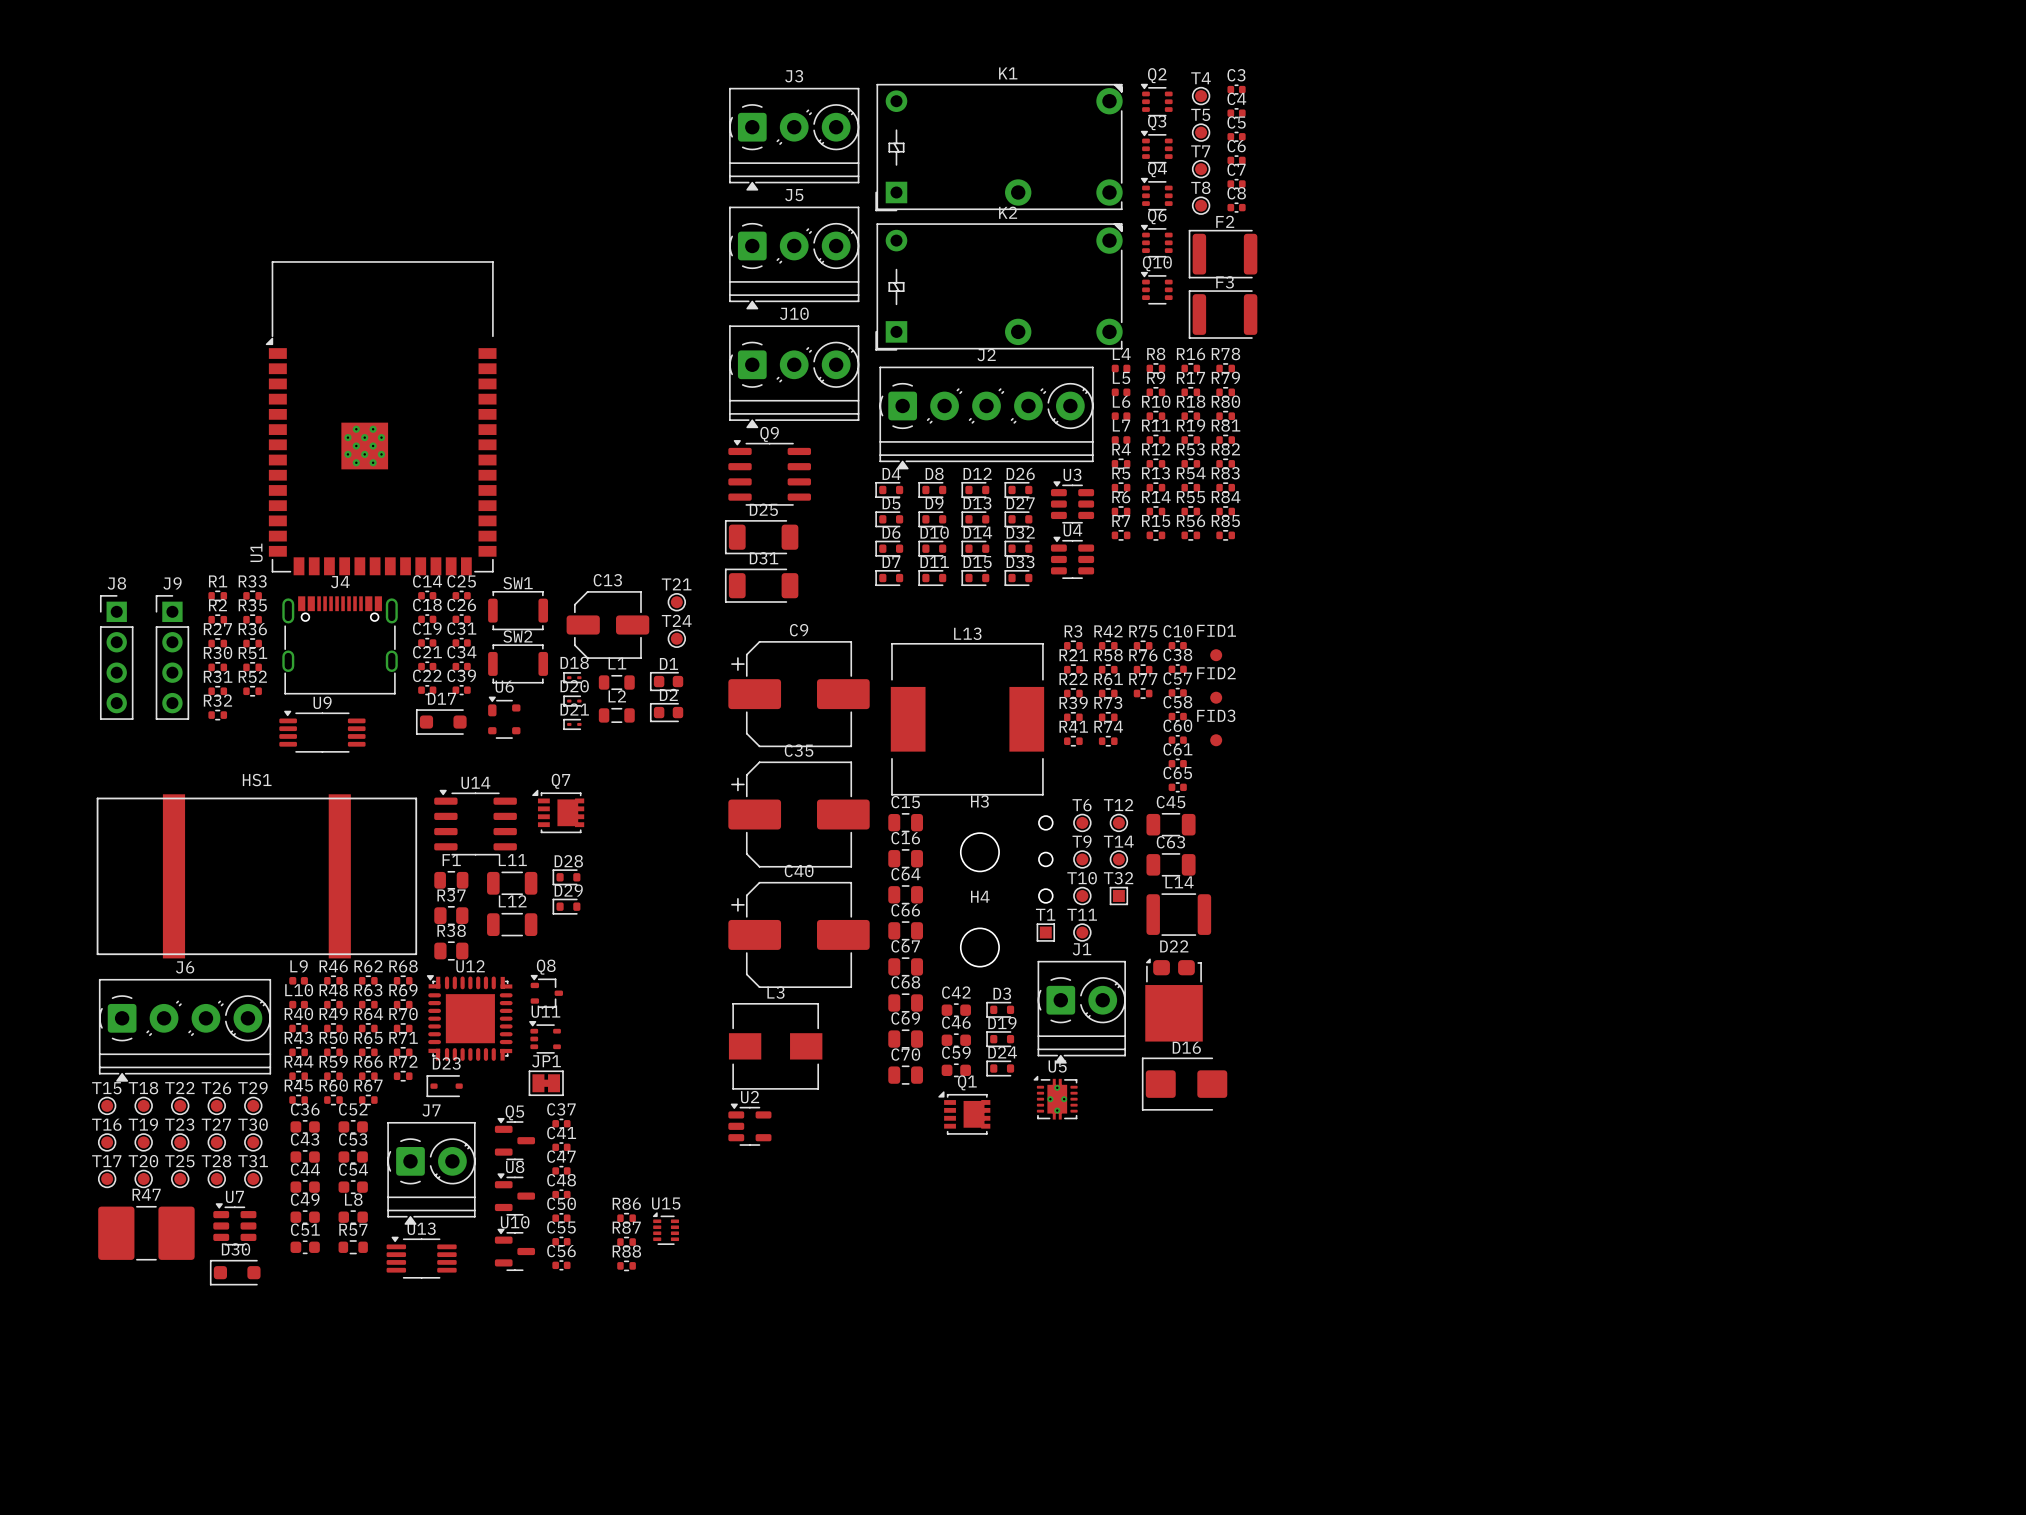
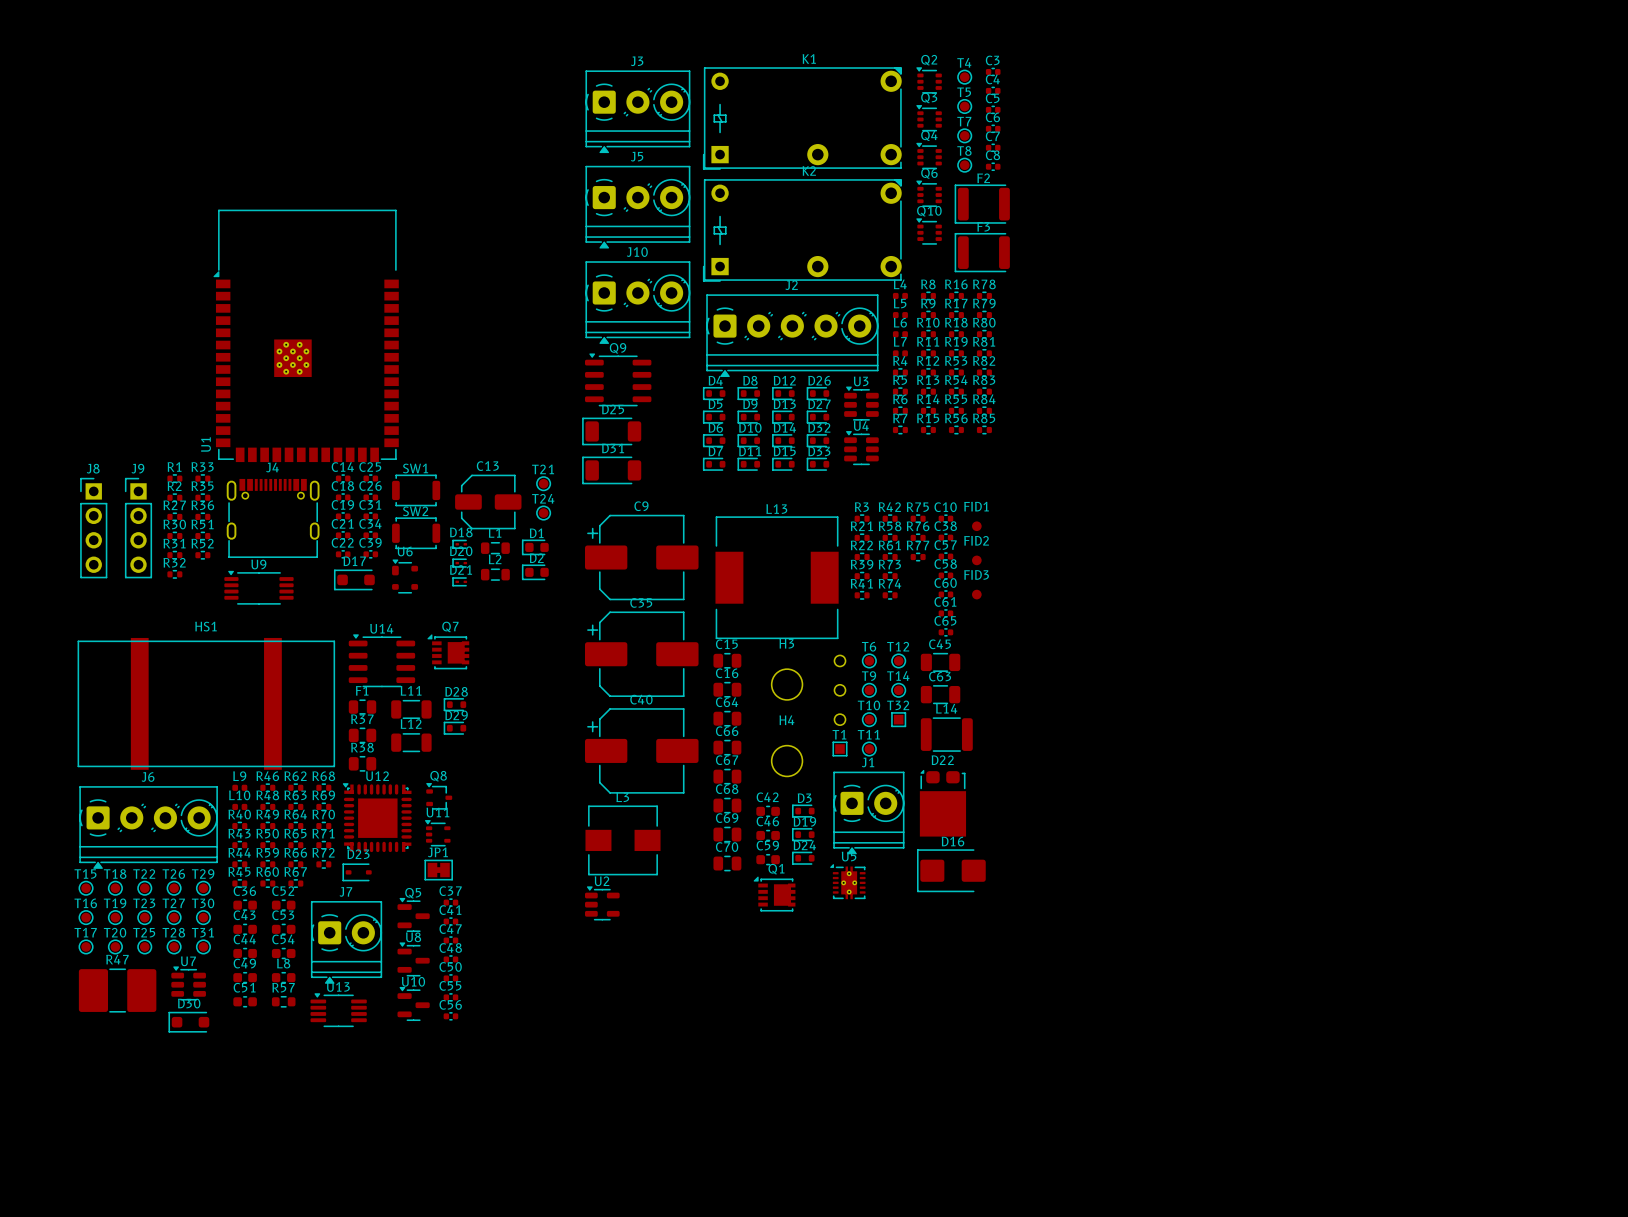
R86: (626, 1218) -> none
U15: (665, 1228) -> none
R87: (626, 1242) -> none
R88: (626, 1265) -> none

